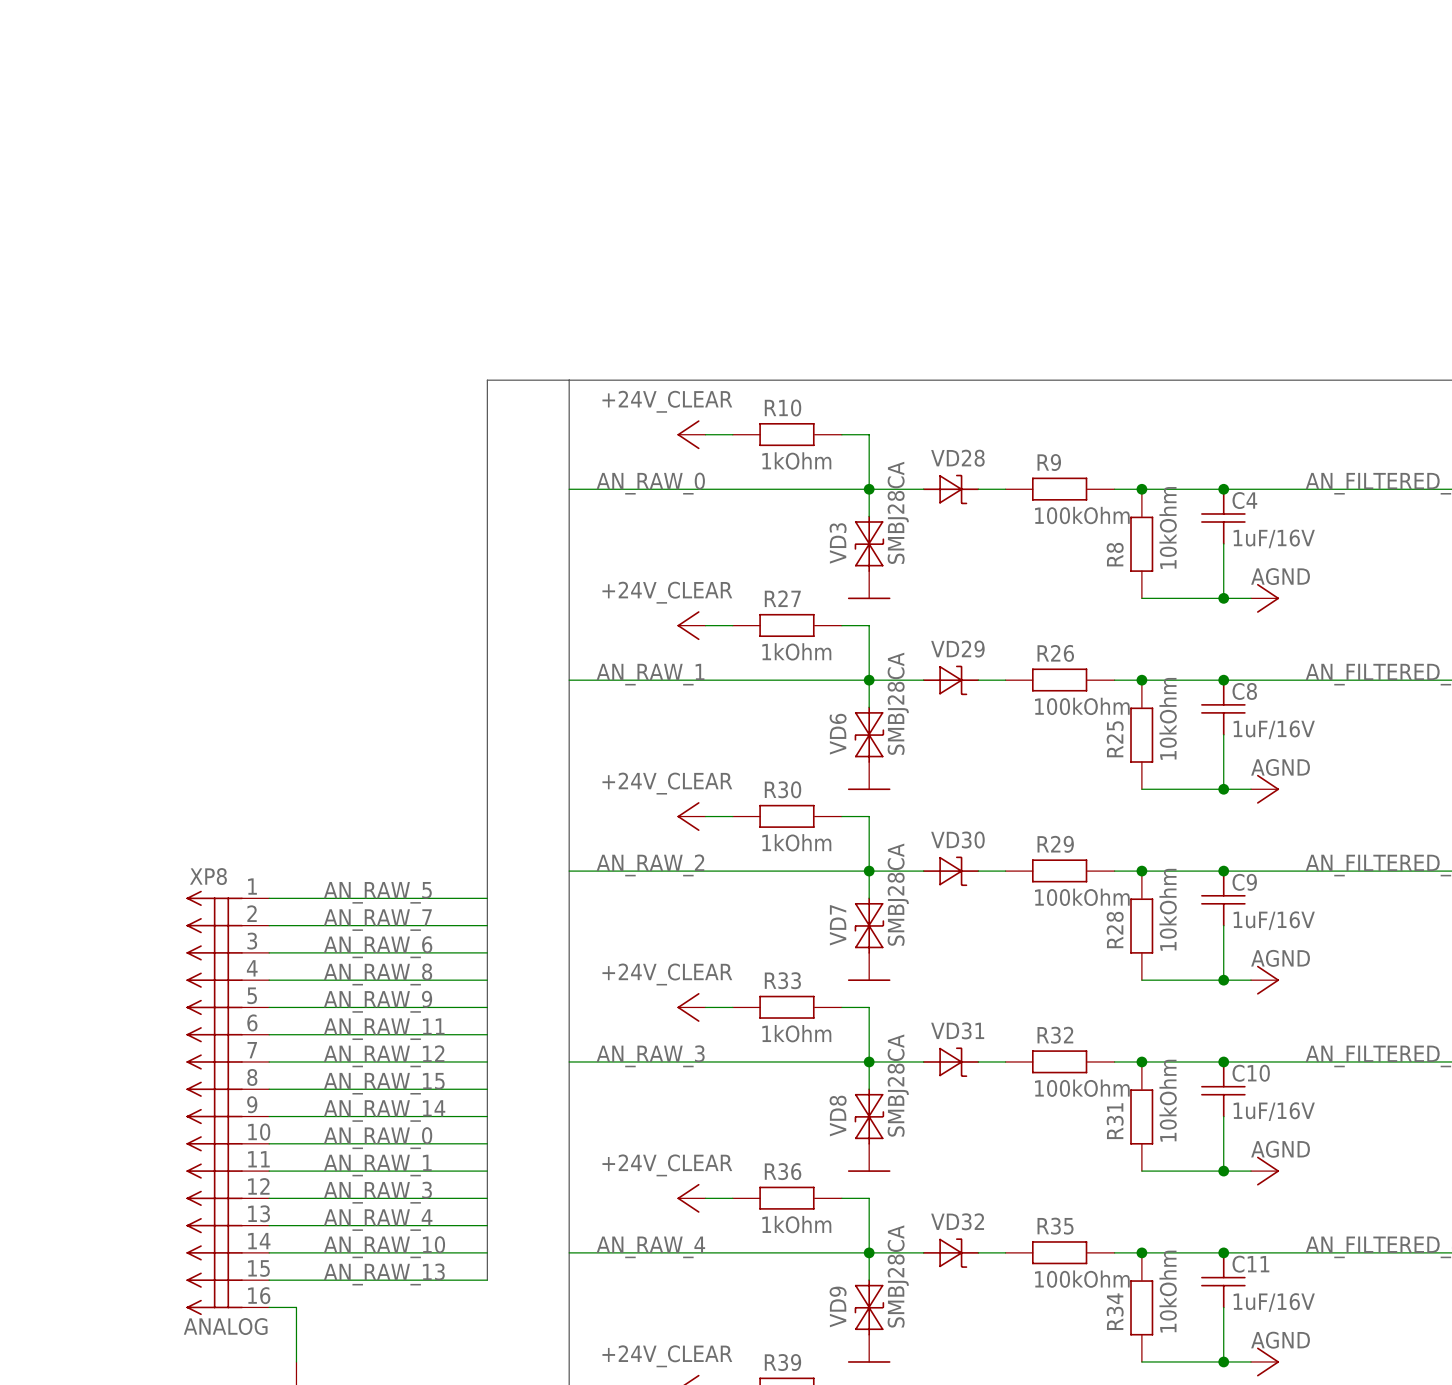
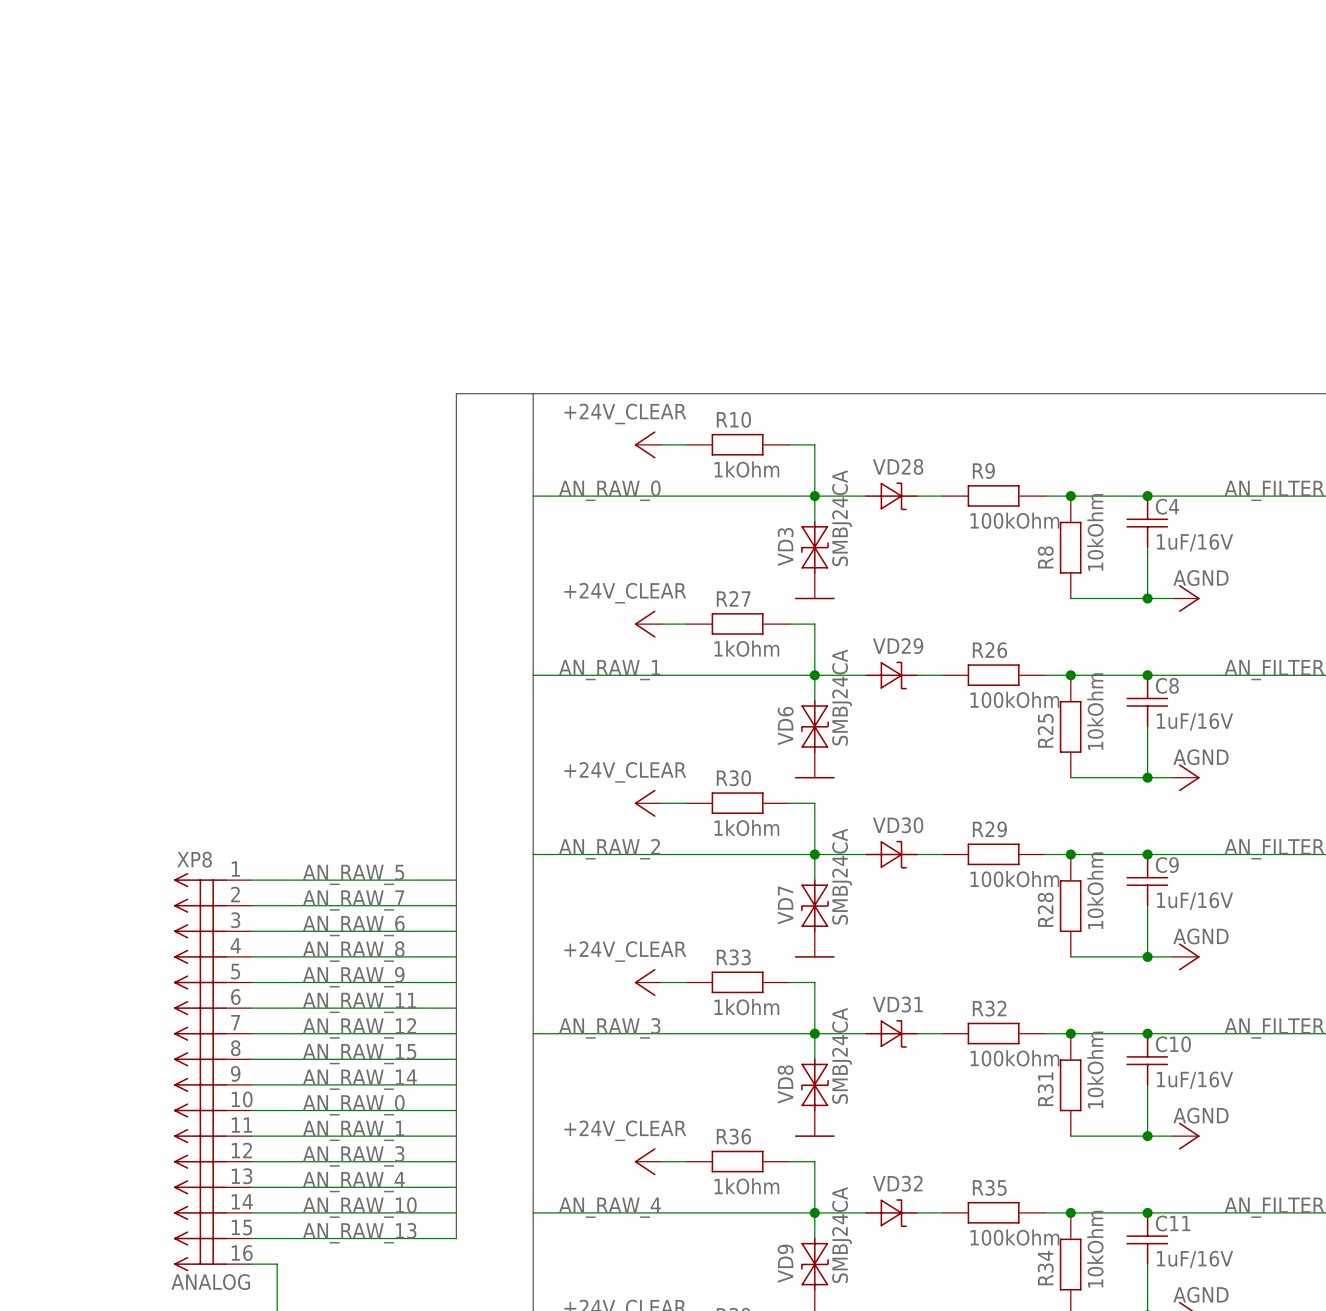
VD3 value: SMBJ28CA (898, 512) -> SMBJ24CA (842, 518)
VD6 value: SMBJ28CA (898, 703) -> SMBJ24CA (842, 697)
VD7 value: SMBJ28CA (898, 894) -> SMBJ24CA (842, 876)
VD8 value: SMBJ28CA (898, 1085) -> SMBJ24CA (842, 1055)
VD9 value: SMBJ28CA (898, 1276) -> SMBJ24CA (842, 1235)

